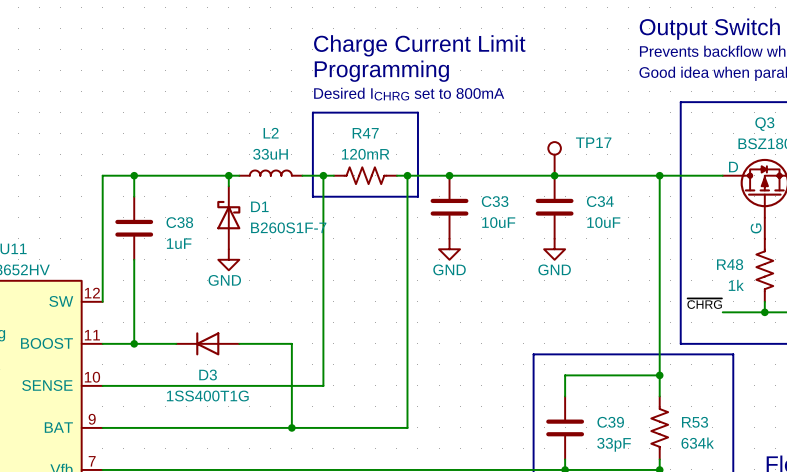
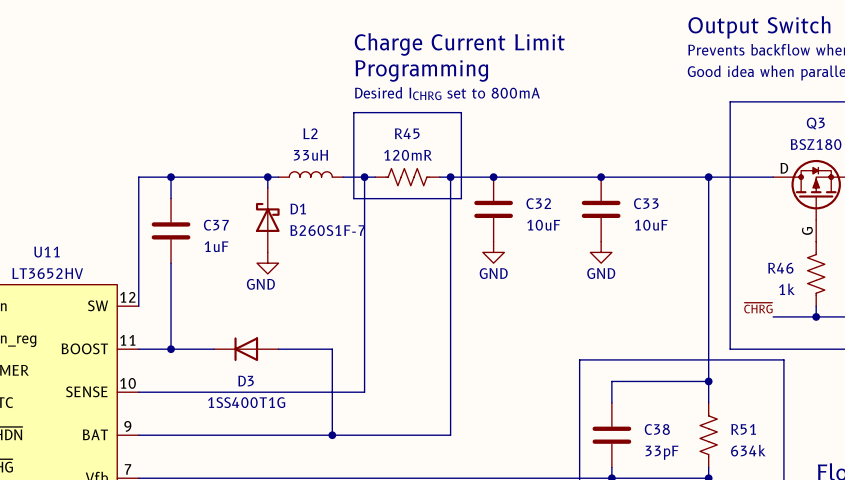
R47 name: R47 (365, 133) -> R45 (407, 133)
TP17: (554, 158) -> none
C33 name: C33 (495, 201) -> C32 (538, 203)
C34 name: C34 (600, 201) -> C33 (646, 203)
C38 name: C38 (179, 222) -> C37 (216, 225)
R48 name: R48 (730, 264) -> R46 (780, 268)
C39 name: C39 (610, 422) -> C38 (657, 429)
R53 name: R53 (695, 422) -> R51 (743, 429)

